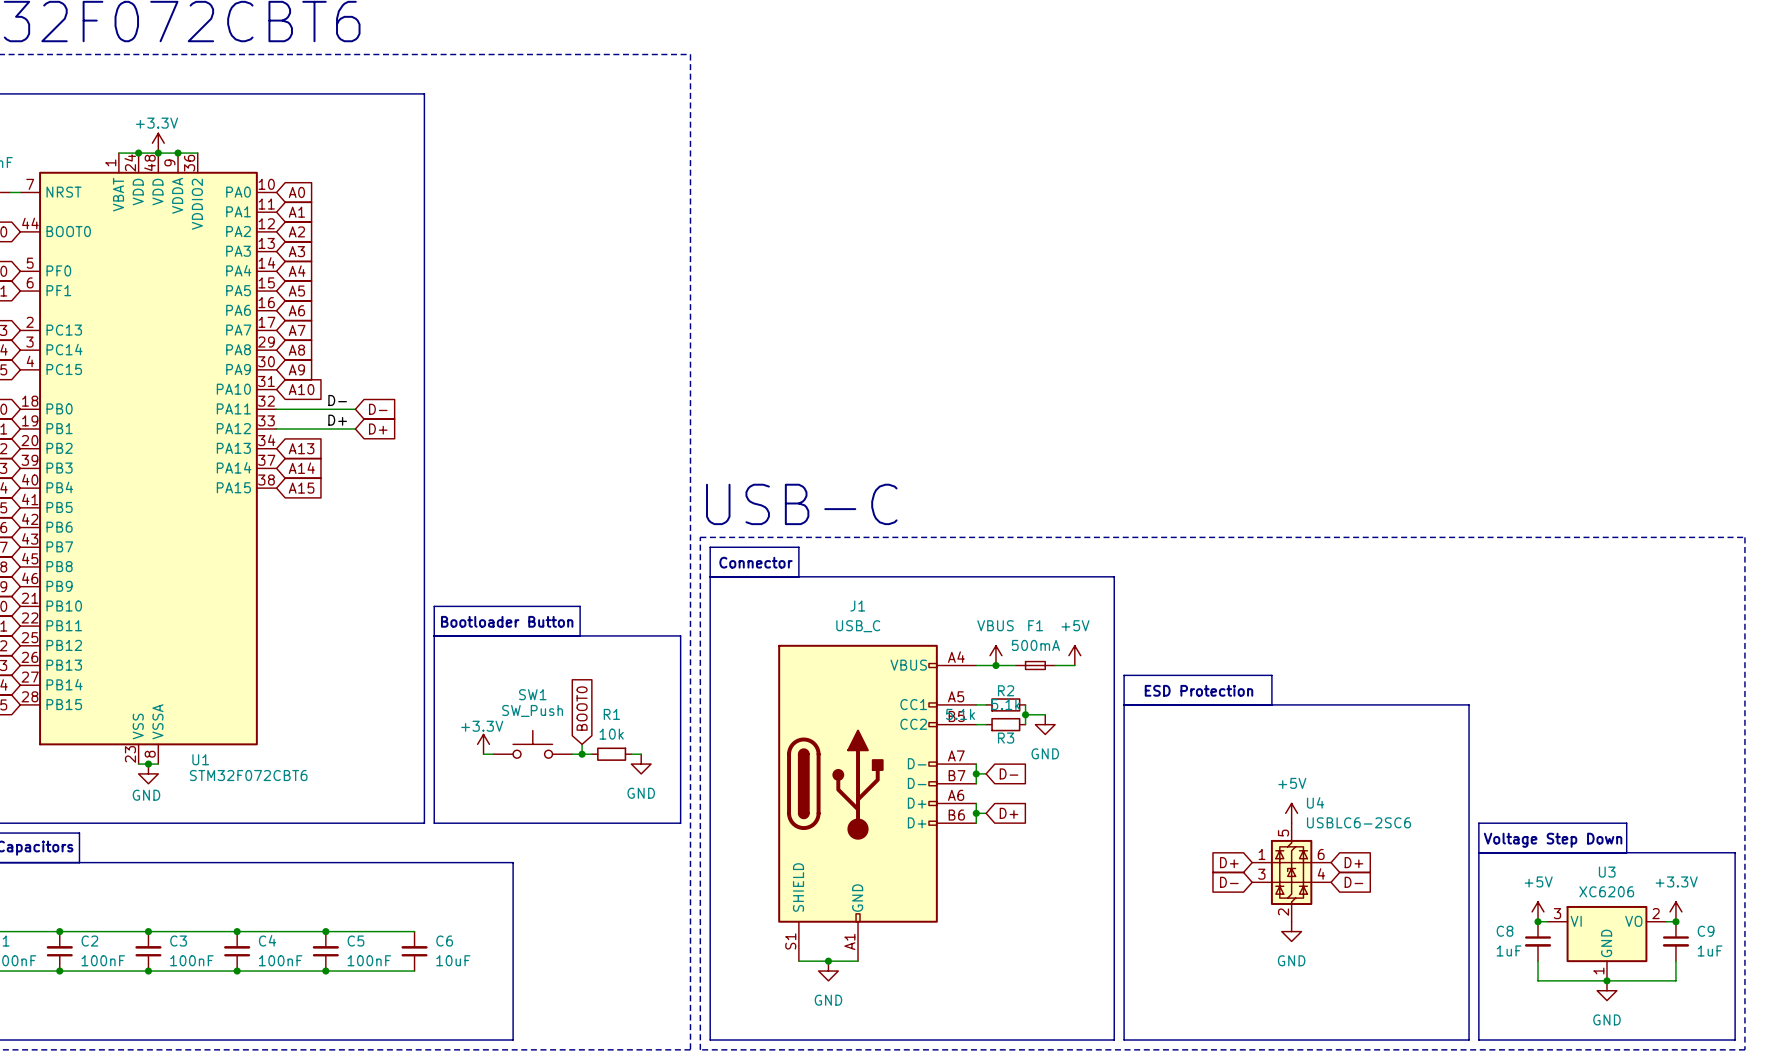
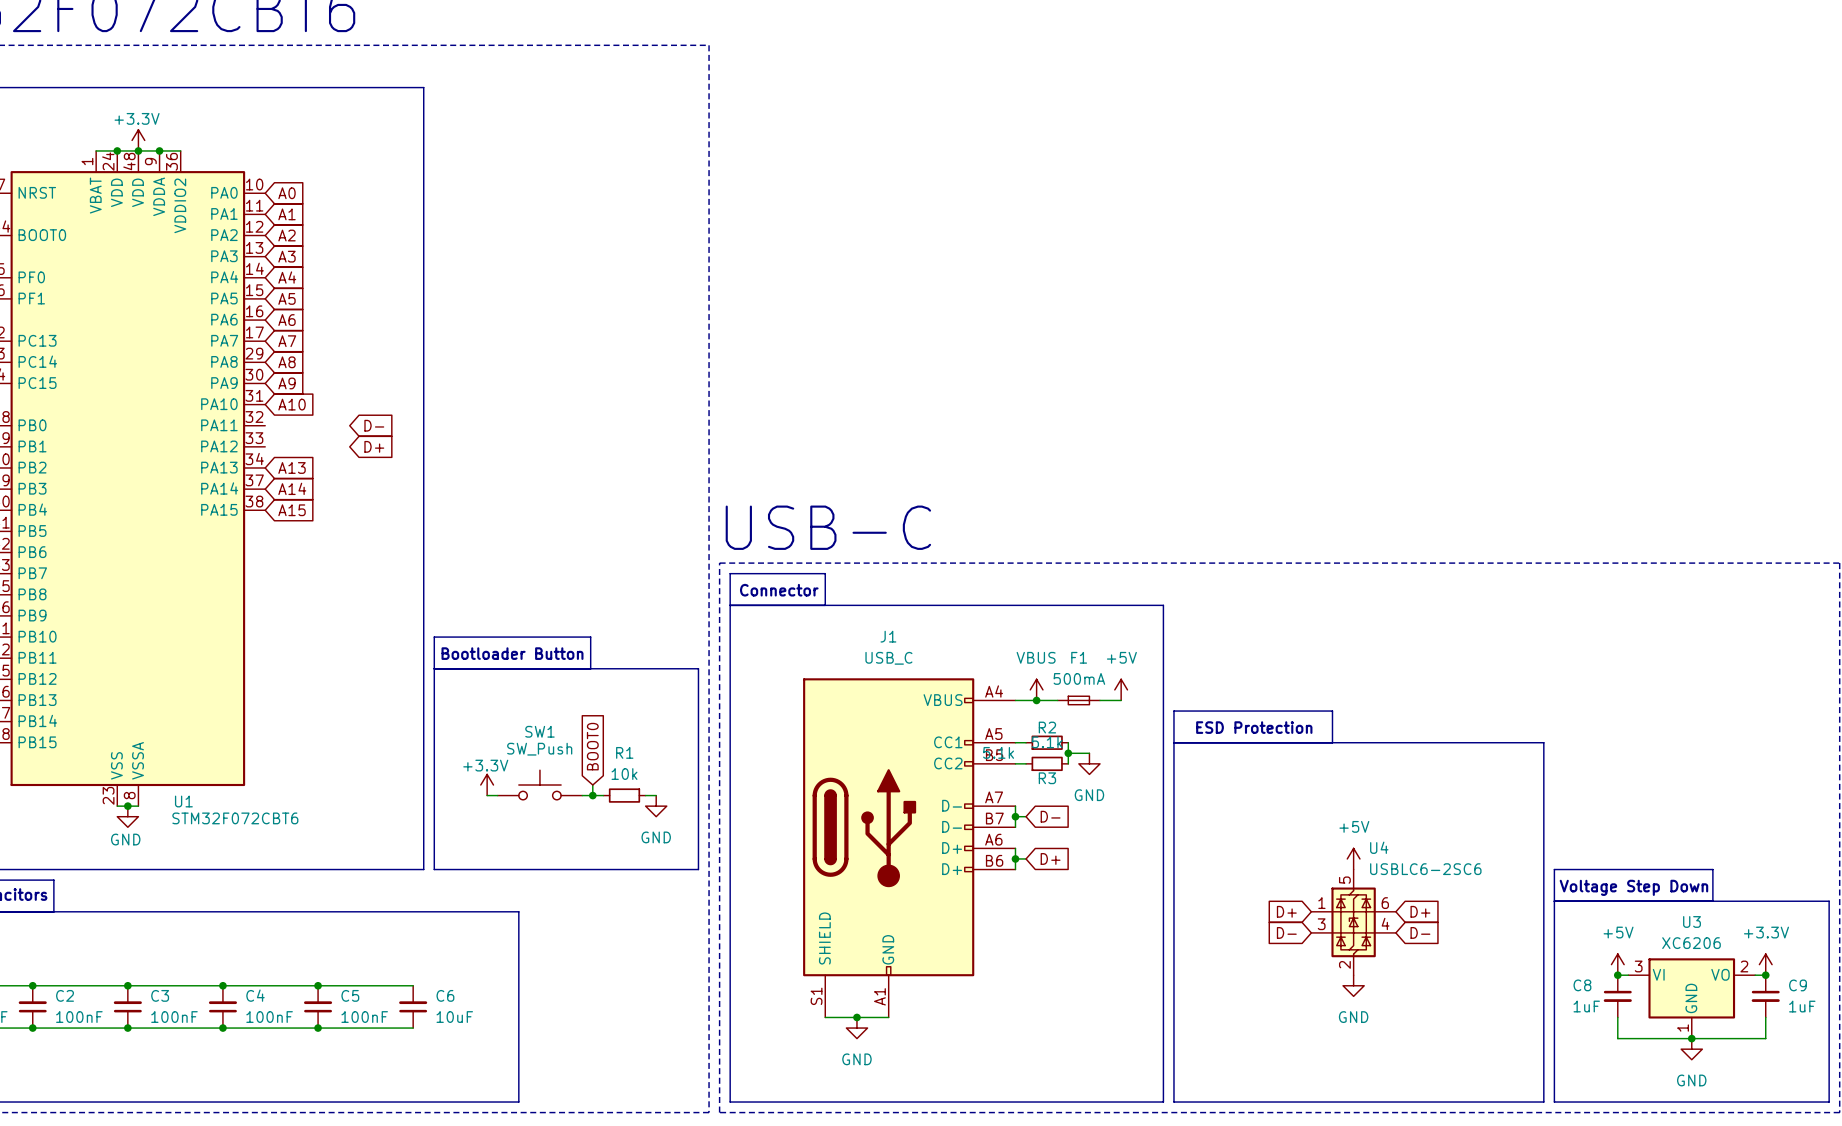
label: D- (337, 400) -> none
wire: (276, 409) (355, 409) -> none
label: D+ (337, 420) -> none
wire: (276, 428) (355, 428) -> none

